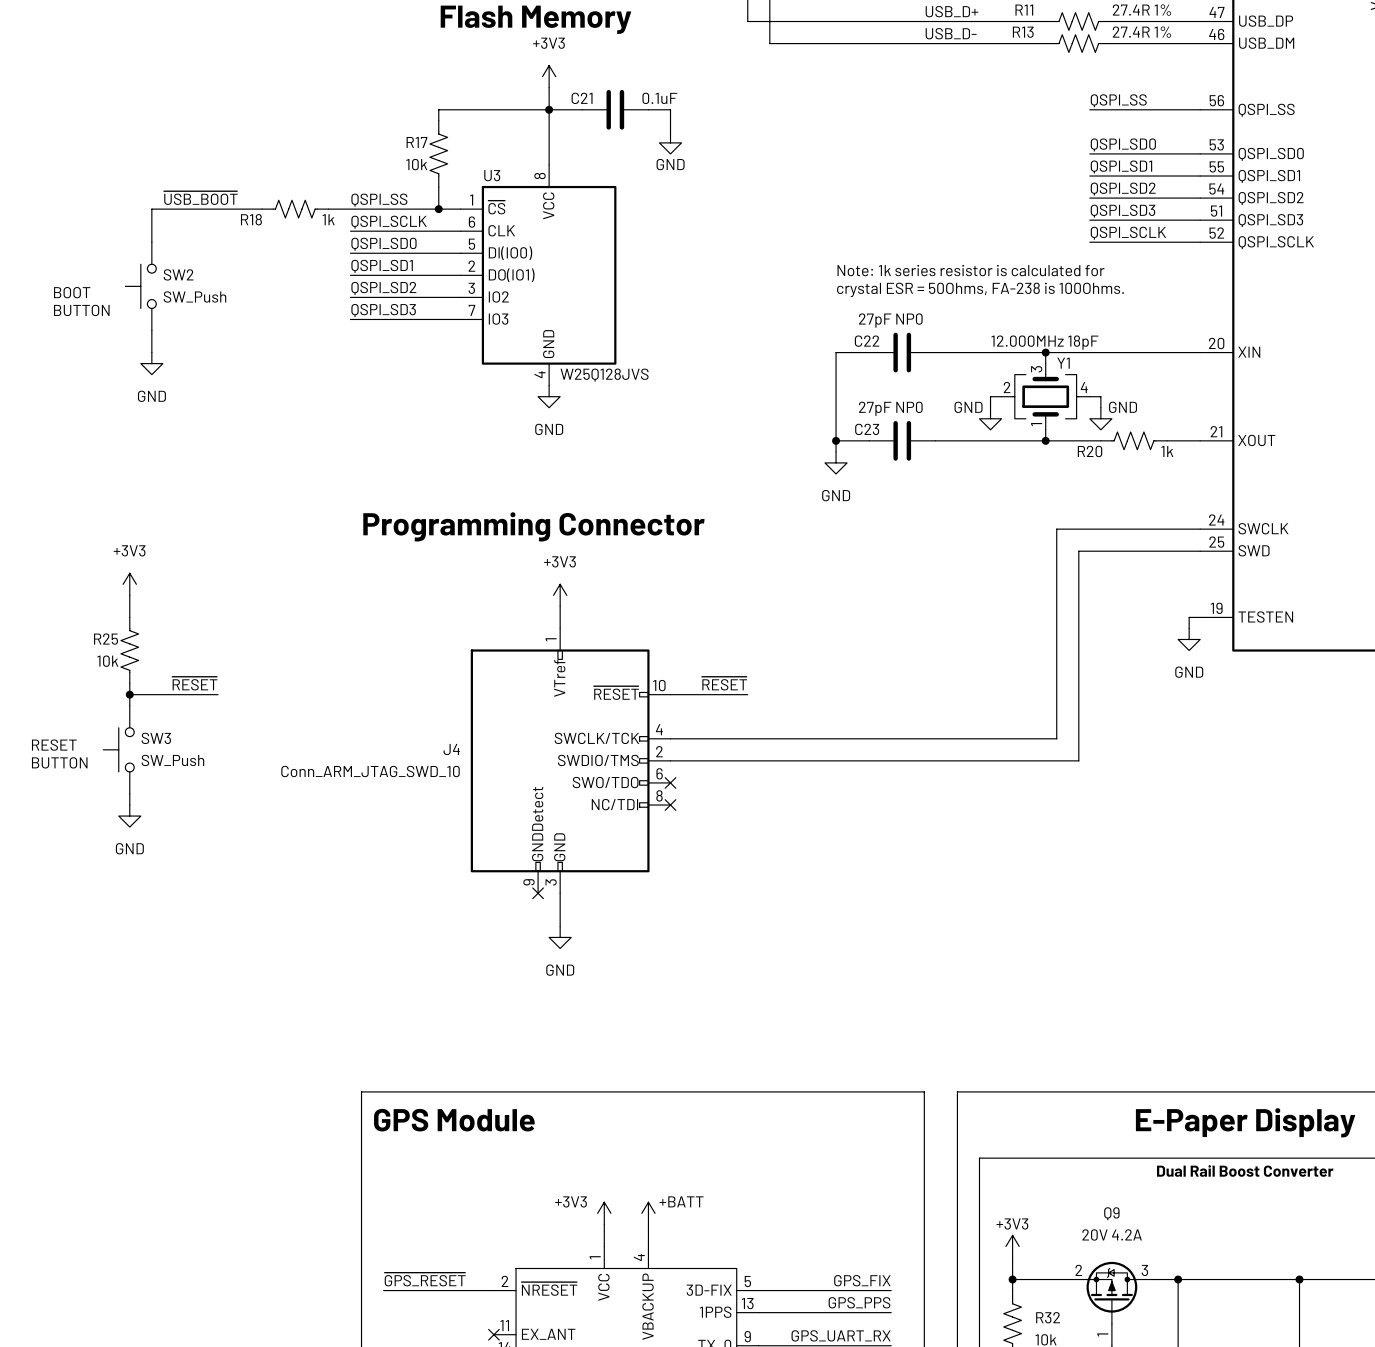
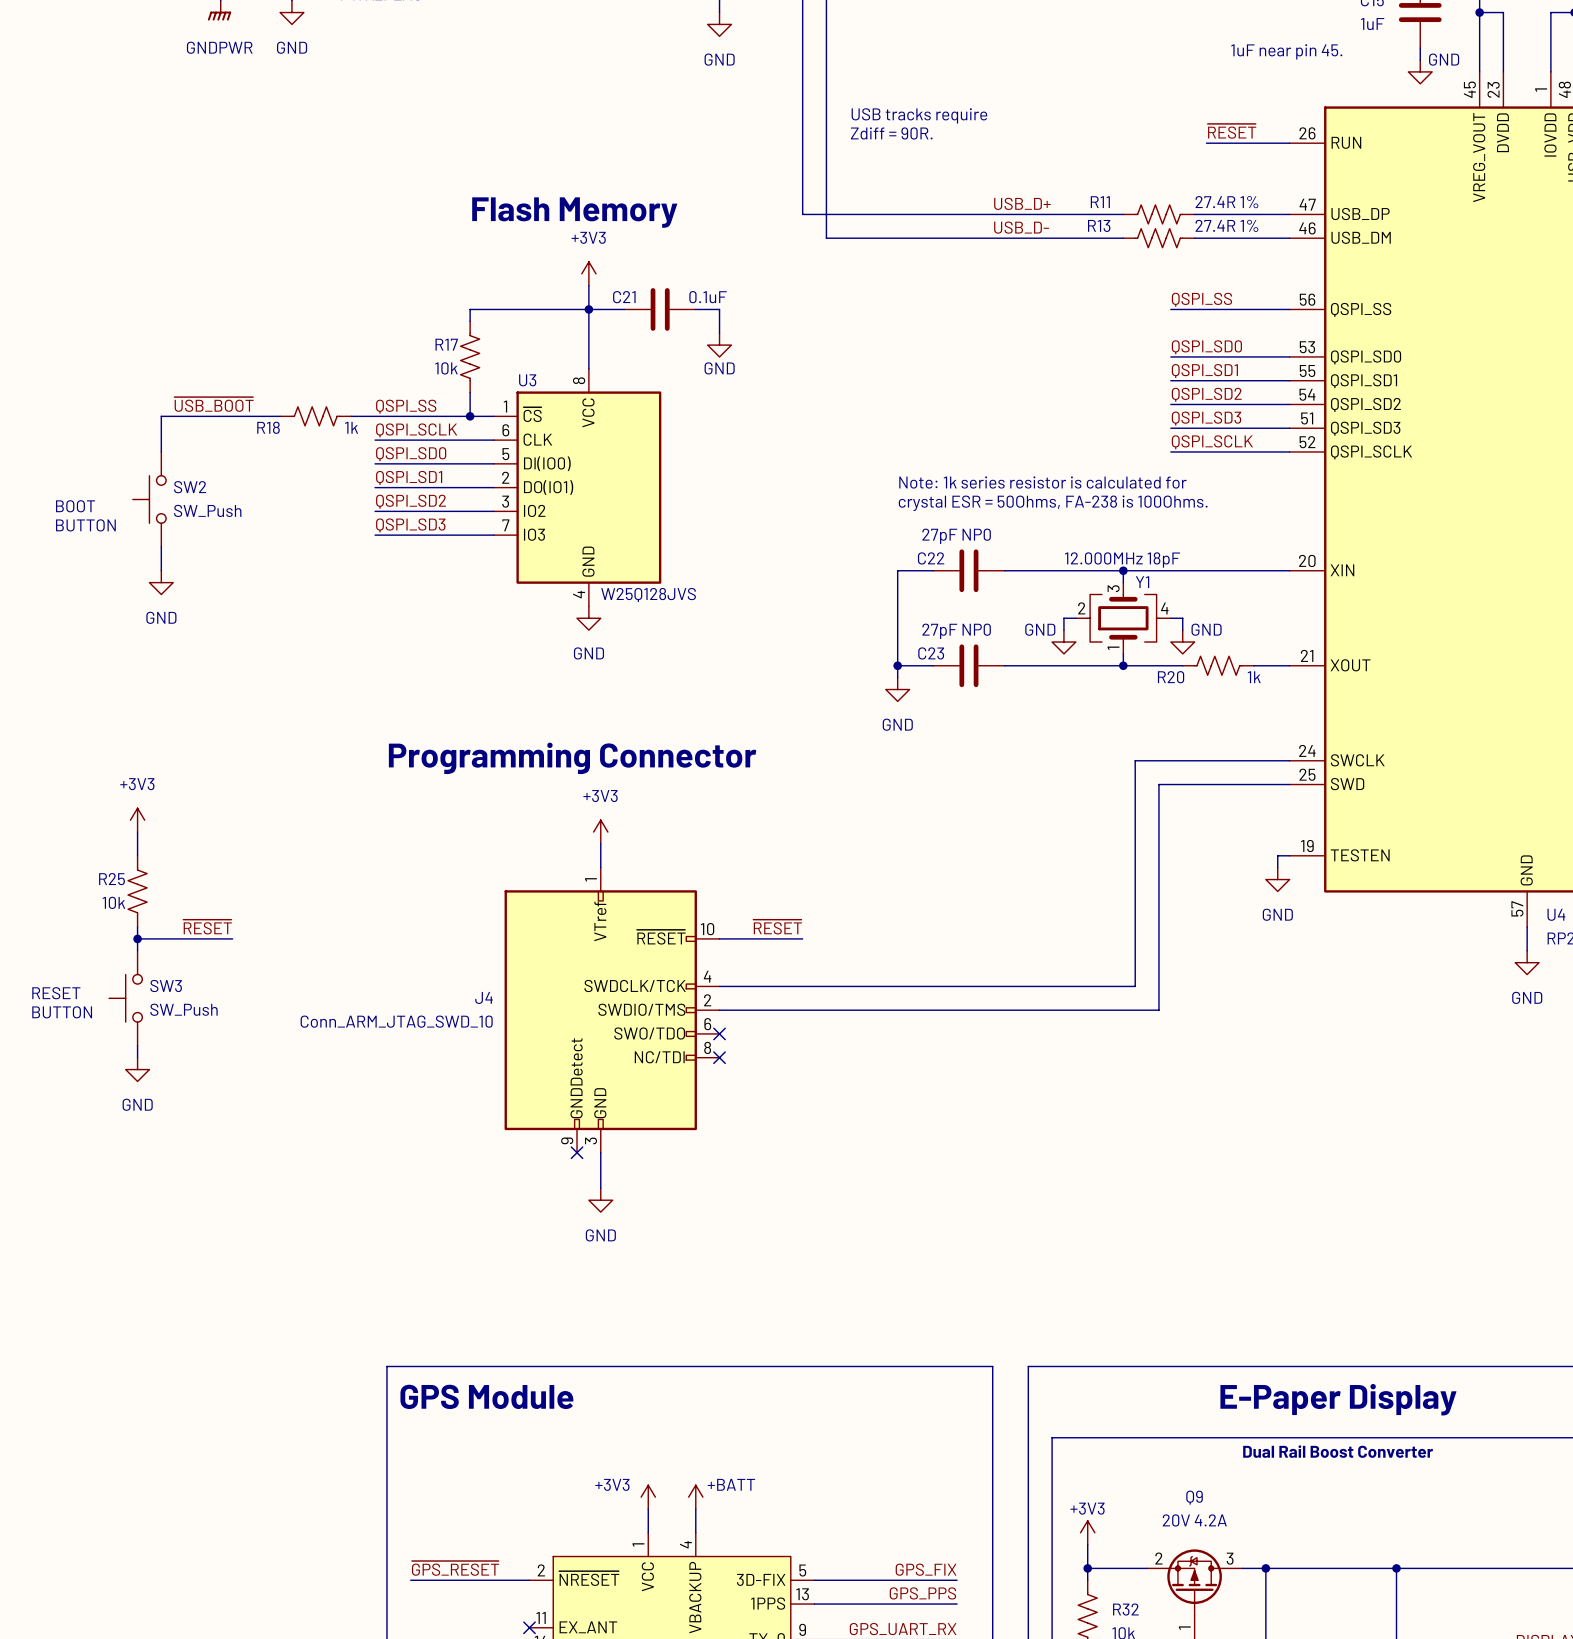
J4 pin name: SWCLK/TCK (596, 738) -> SWDCLK/TCK (635, 986)

